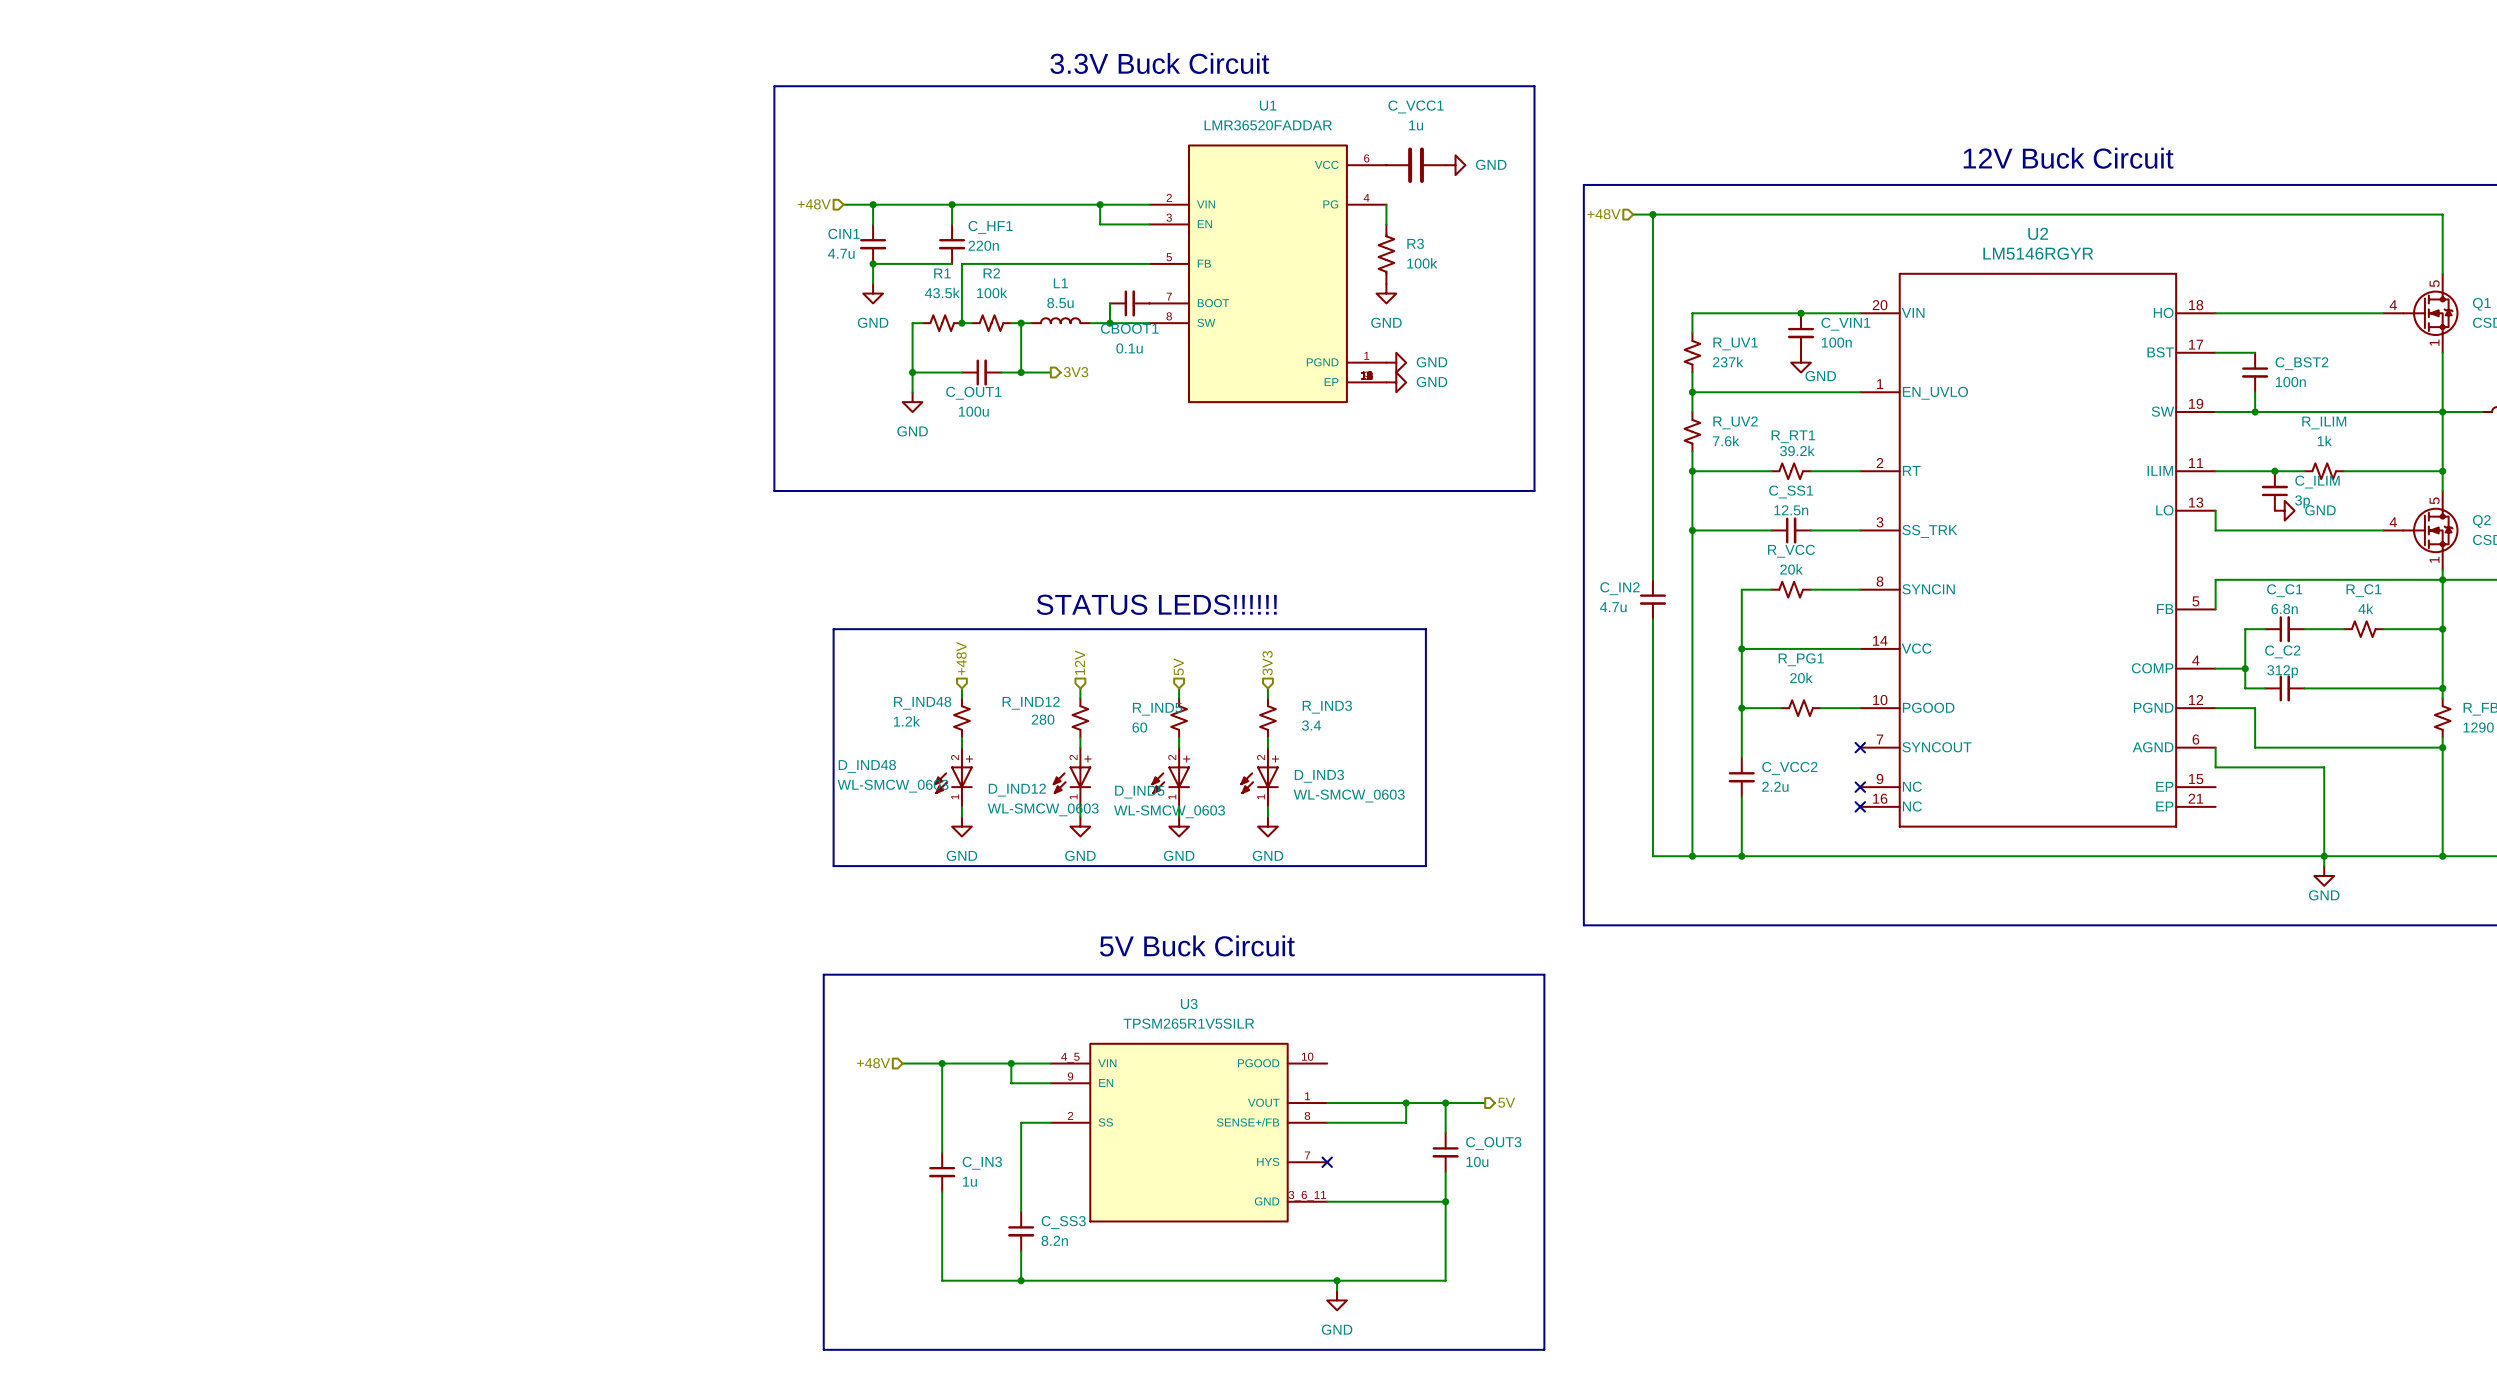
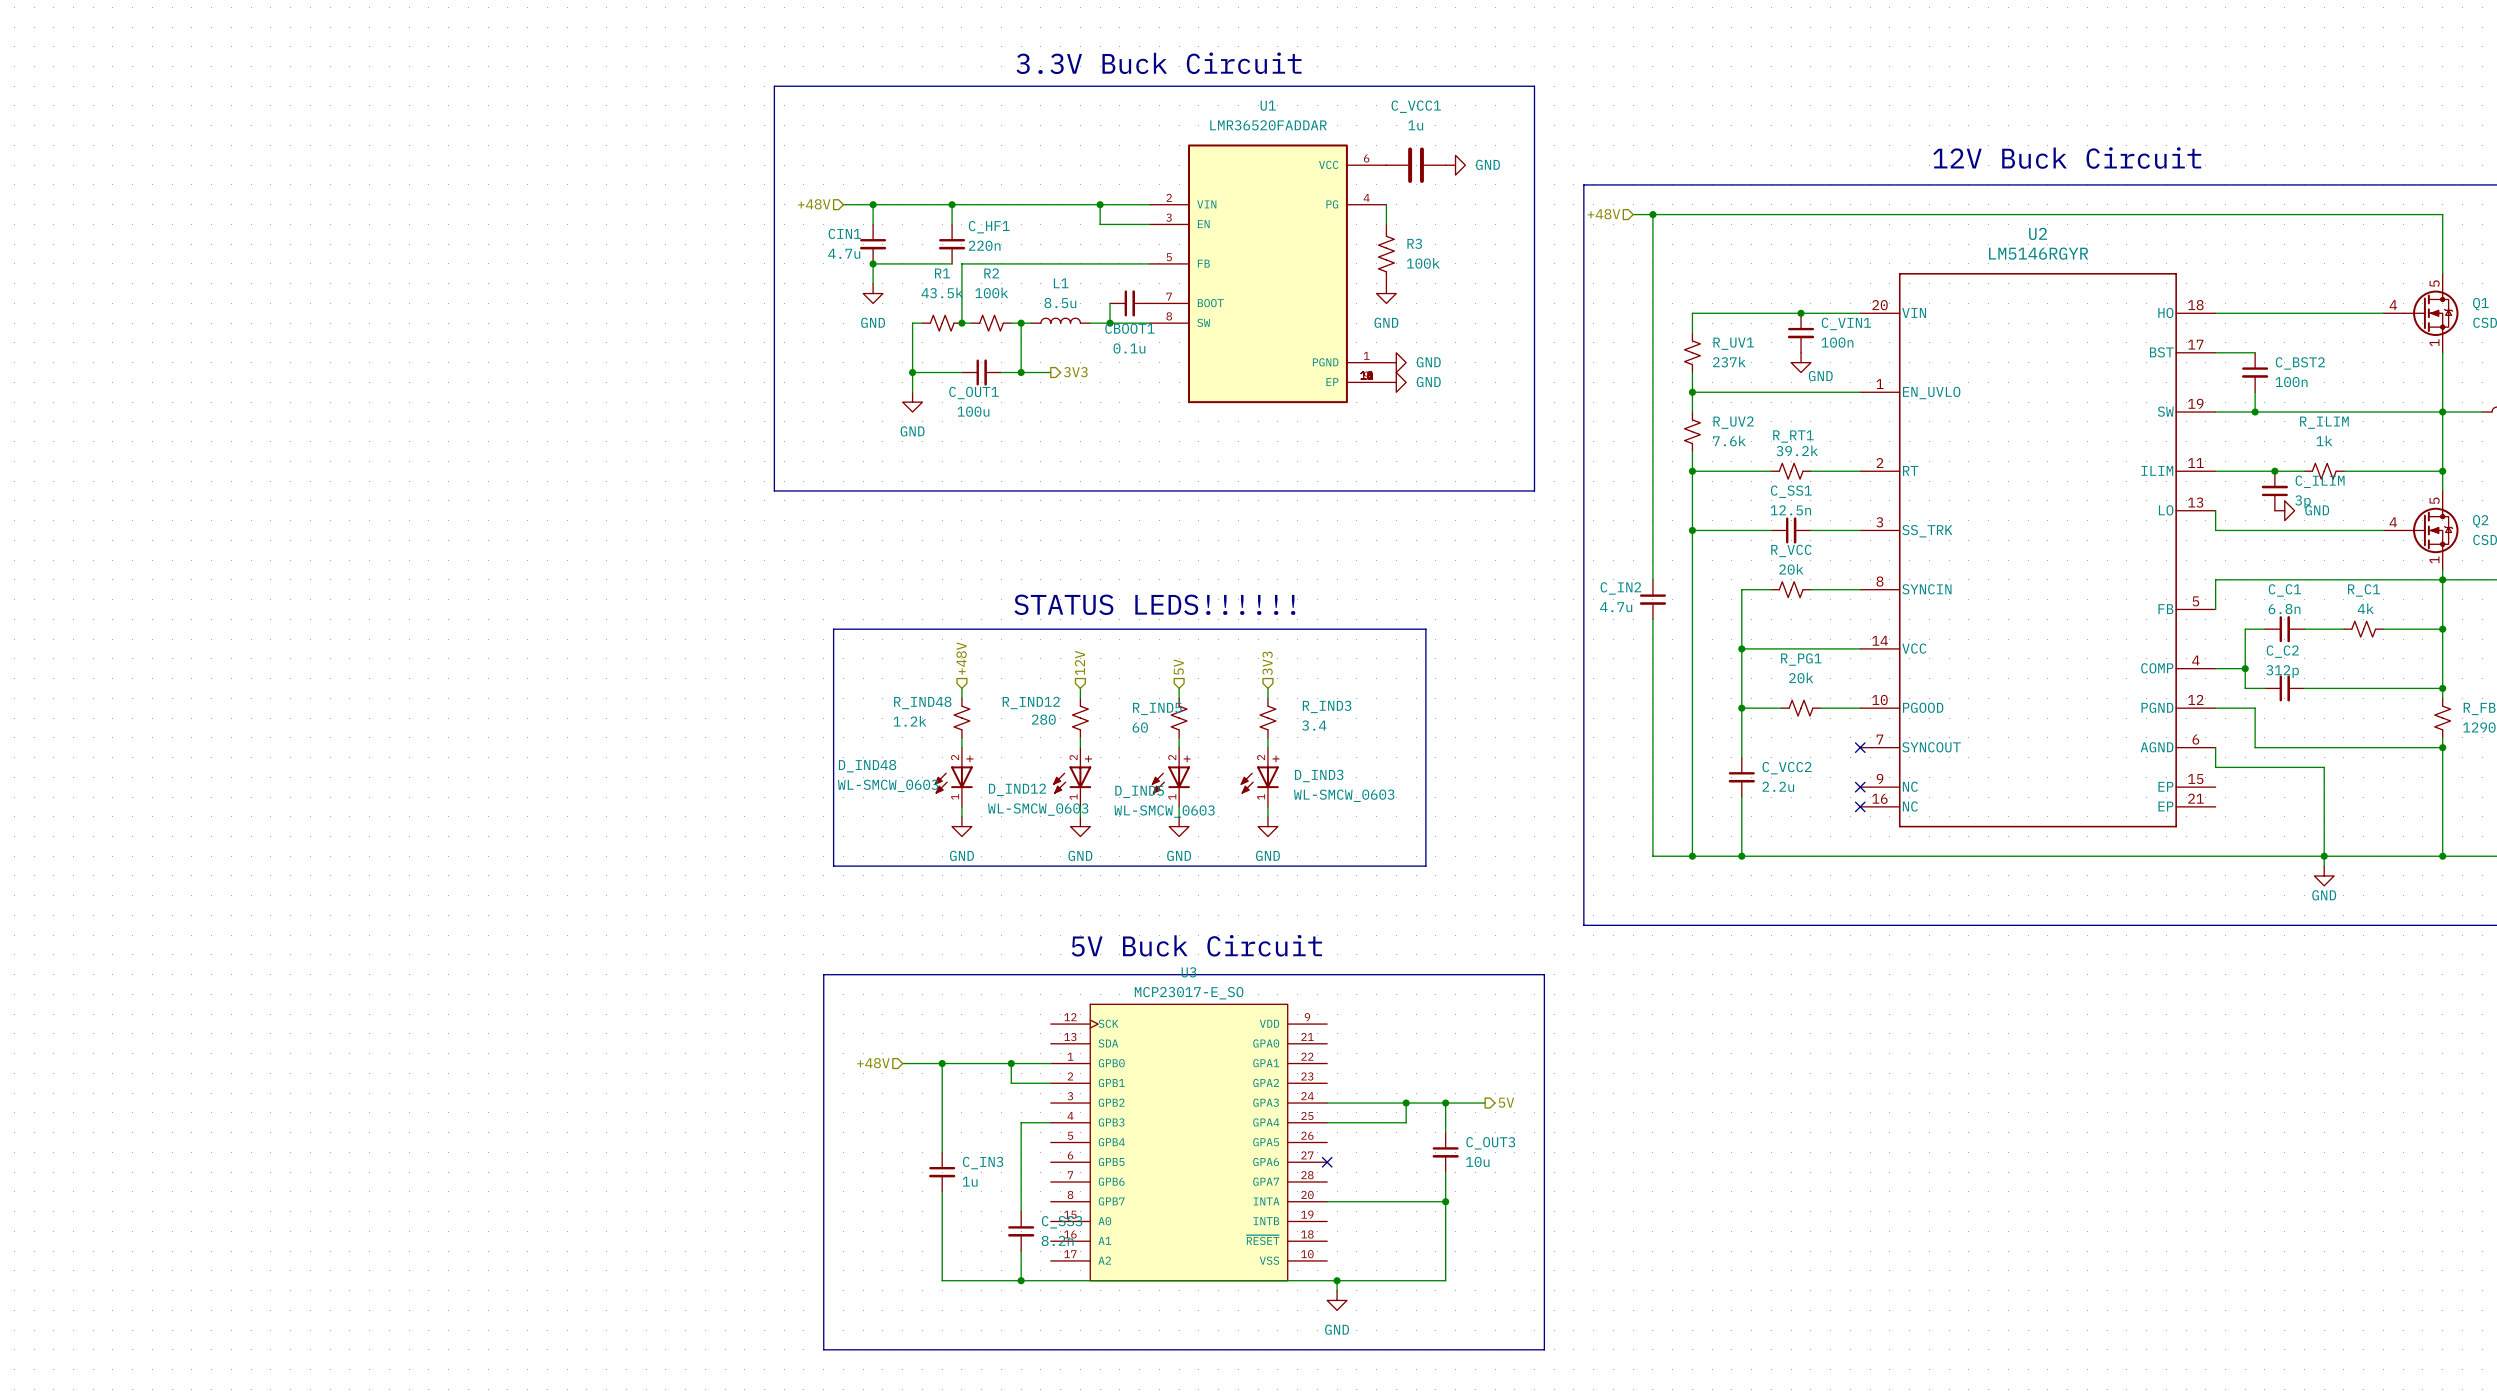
U3 name position: U3 (1189, 1003) -> U3 (1188, 972)
U3 value: TPSM265R1V5SILR (1188, 1023) -> MCP23017-E_SO (1189, 993)
U3 symbol: [1050, 1042, 1328, 1223] -> [1050, 1003, 1328, 1282]

